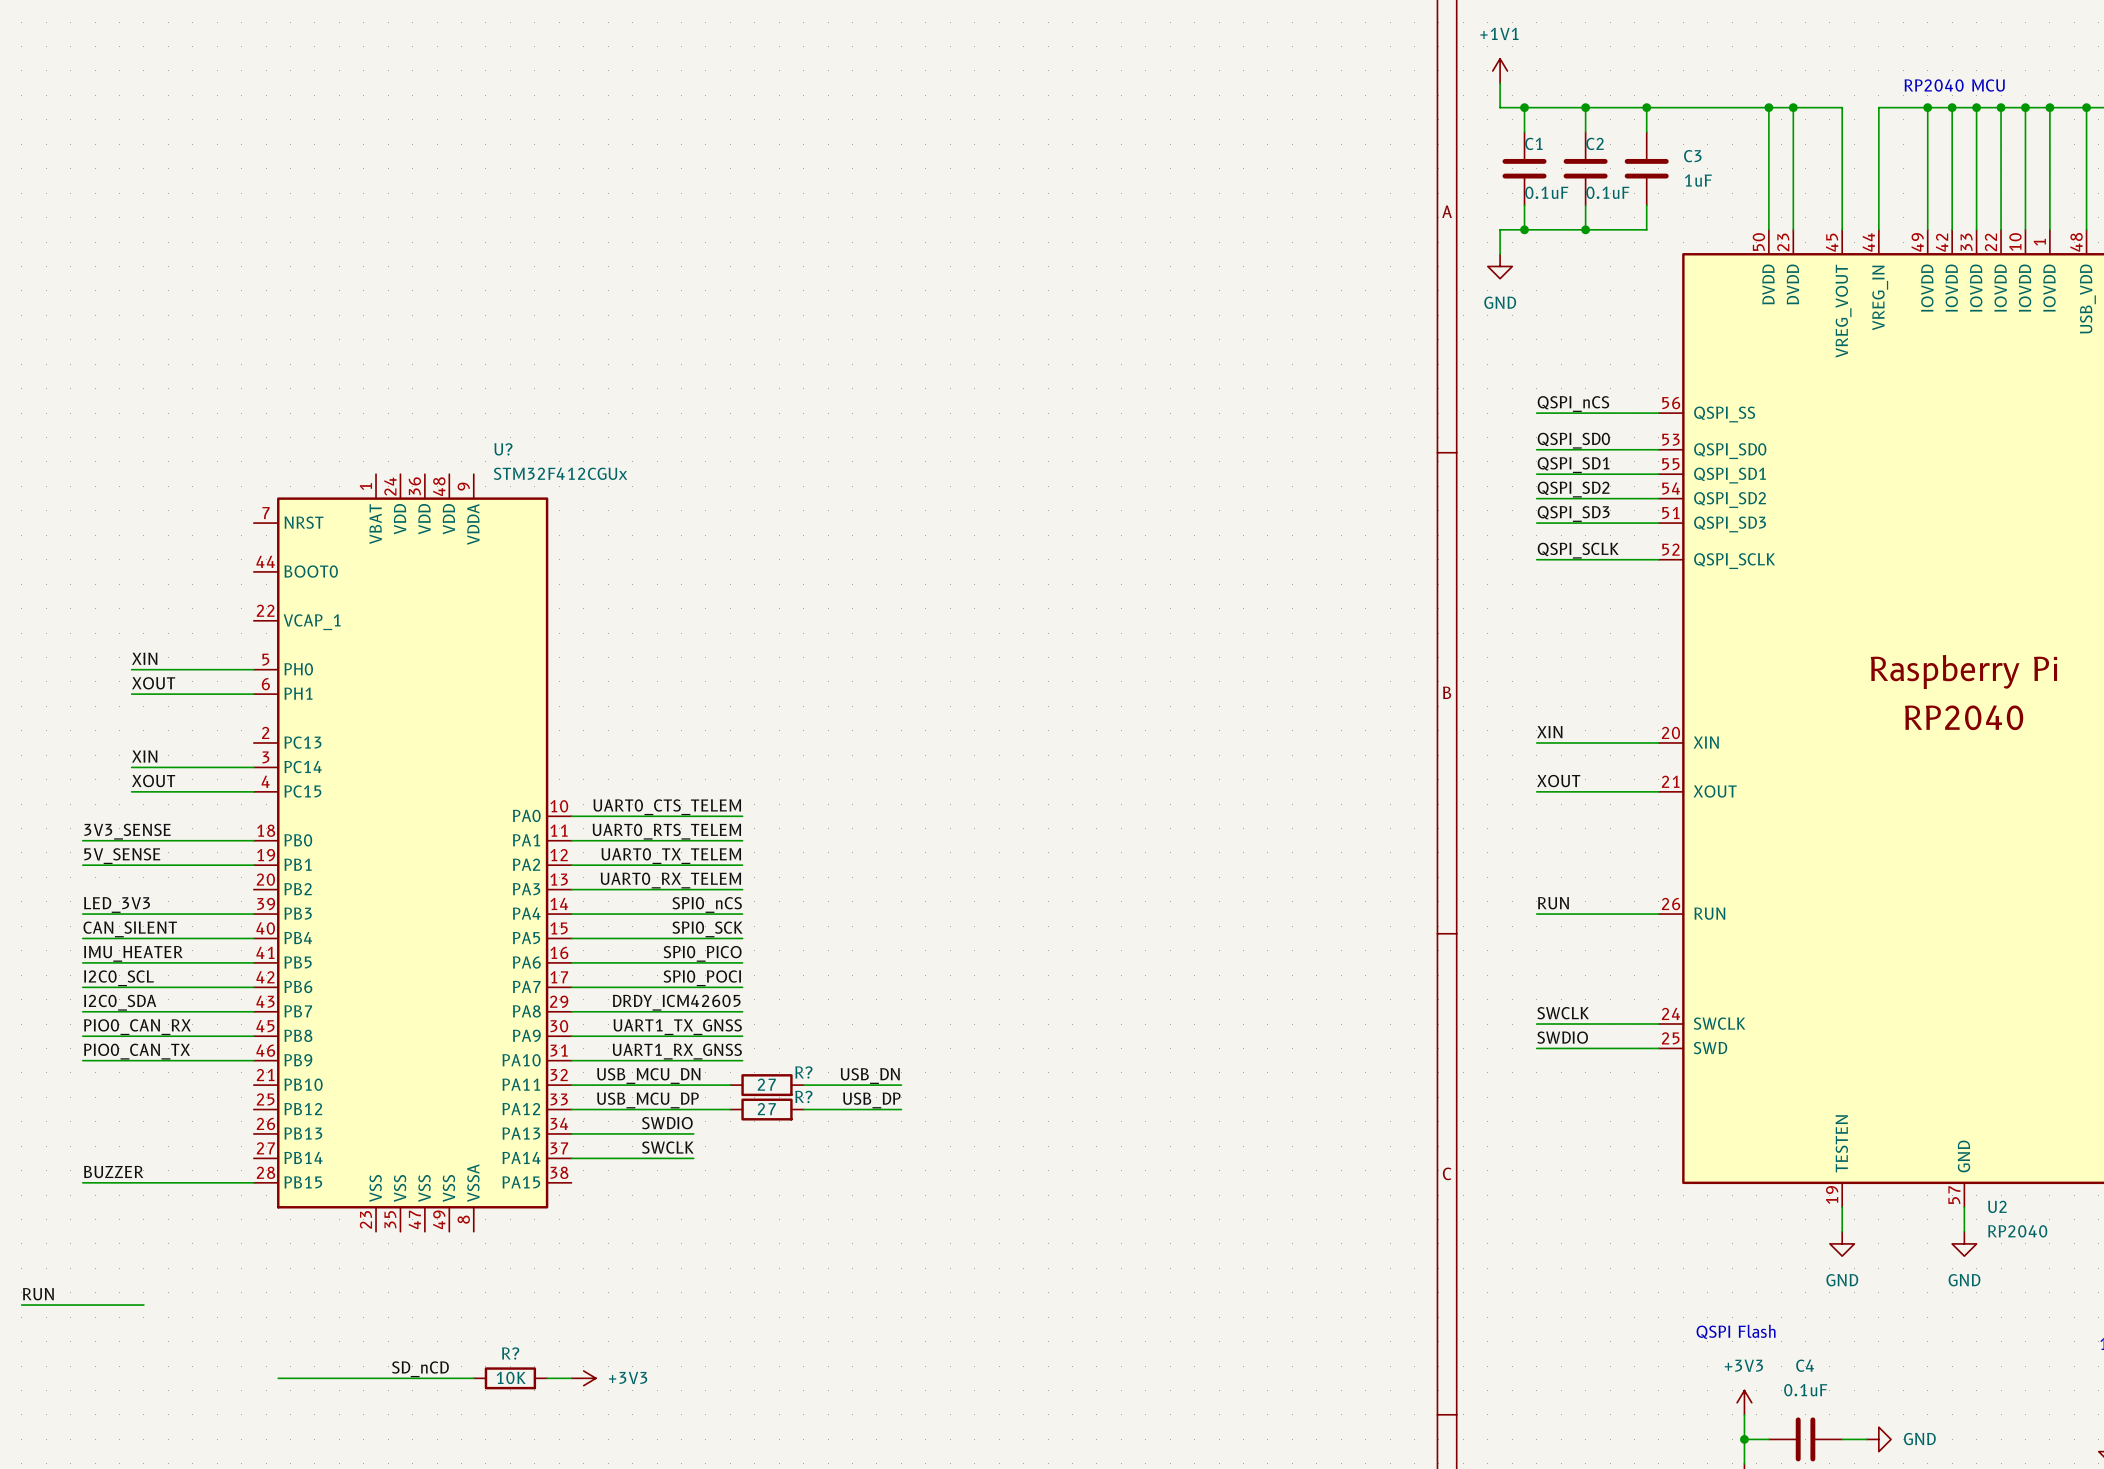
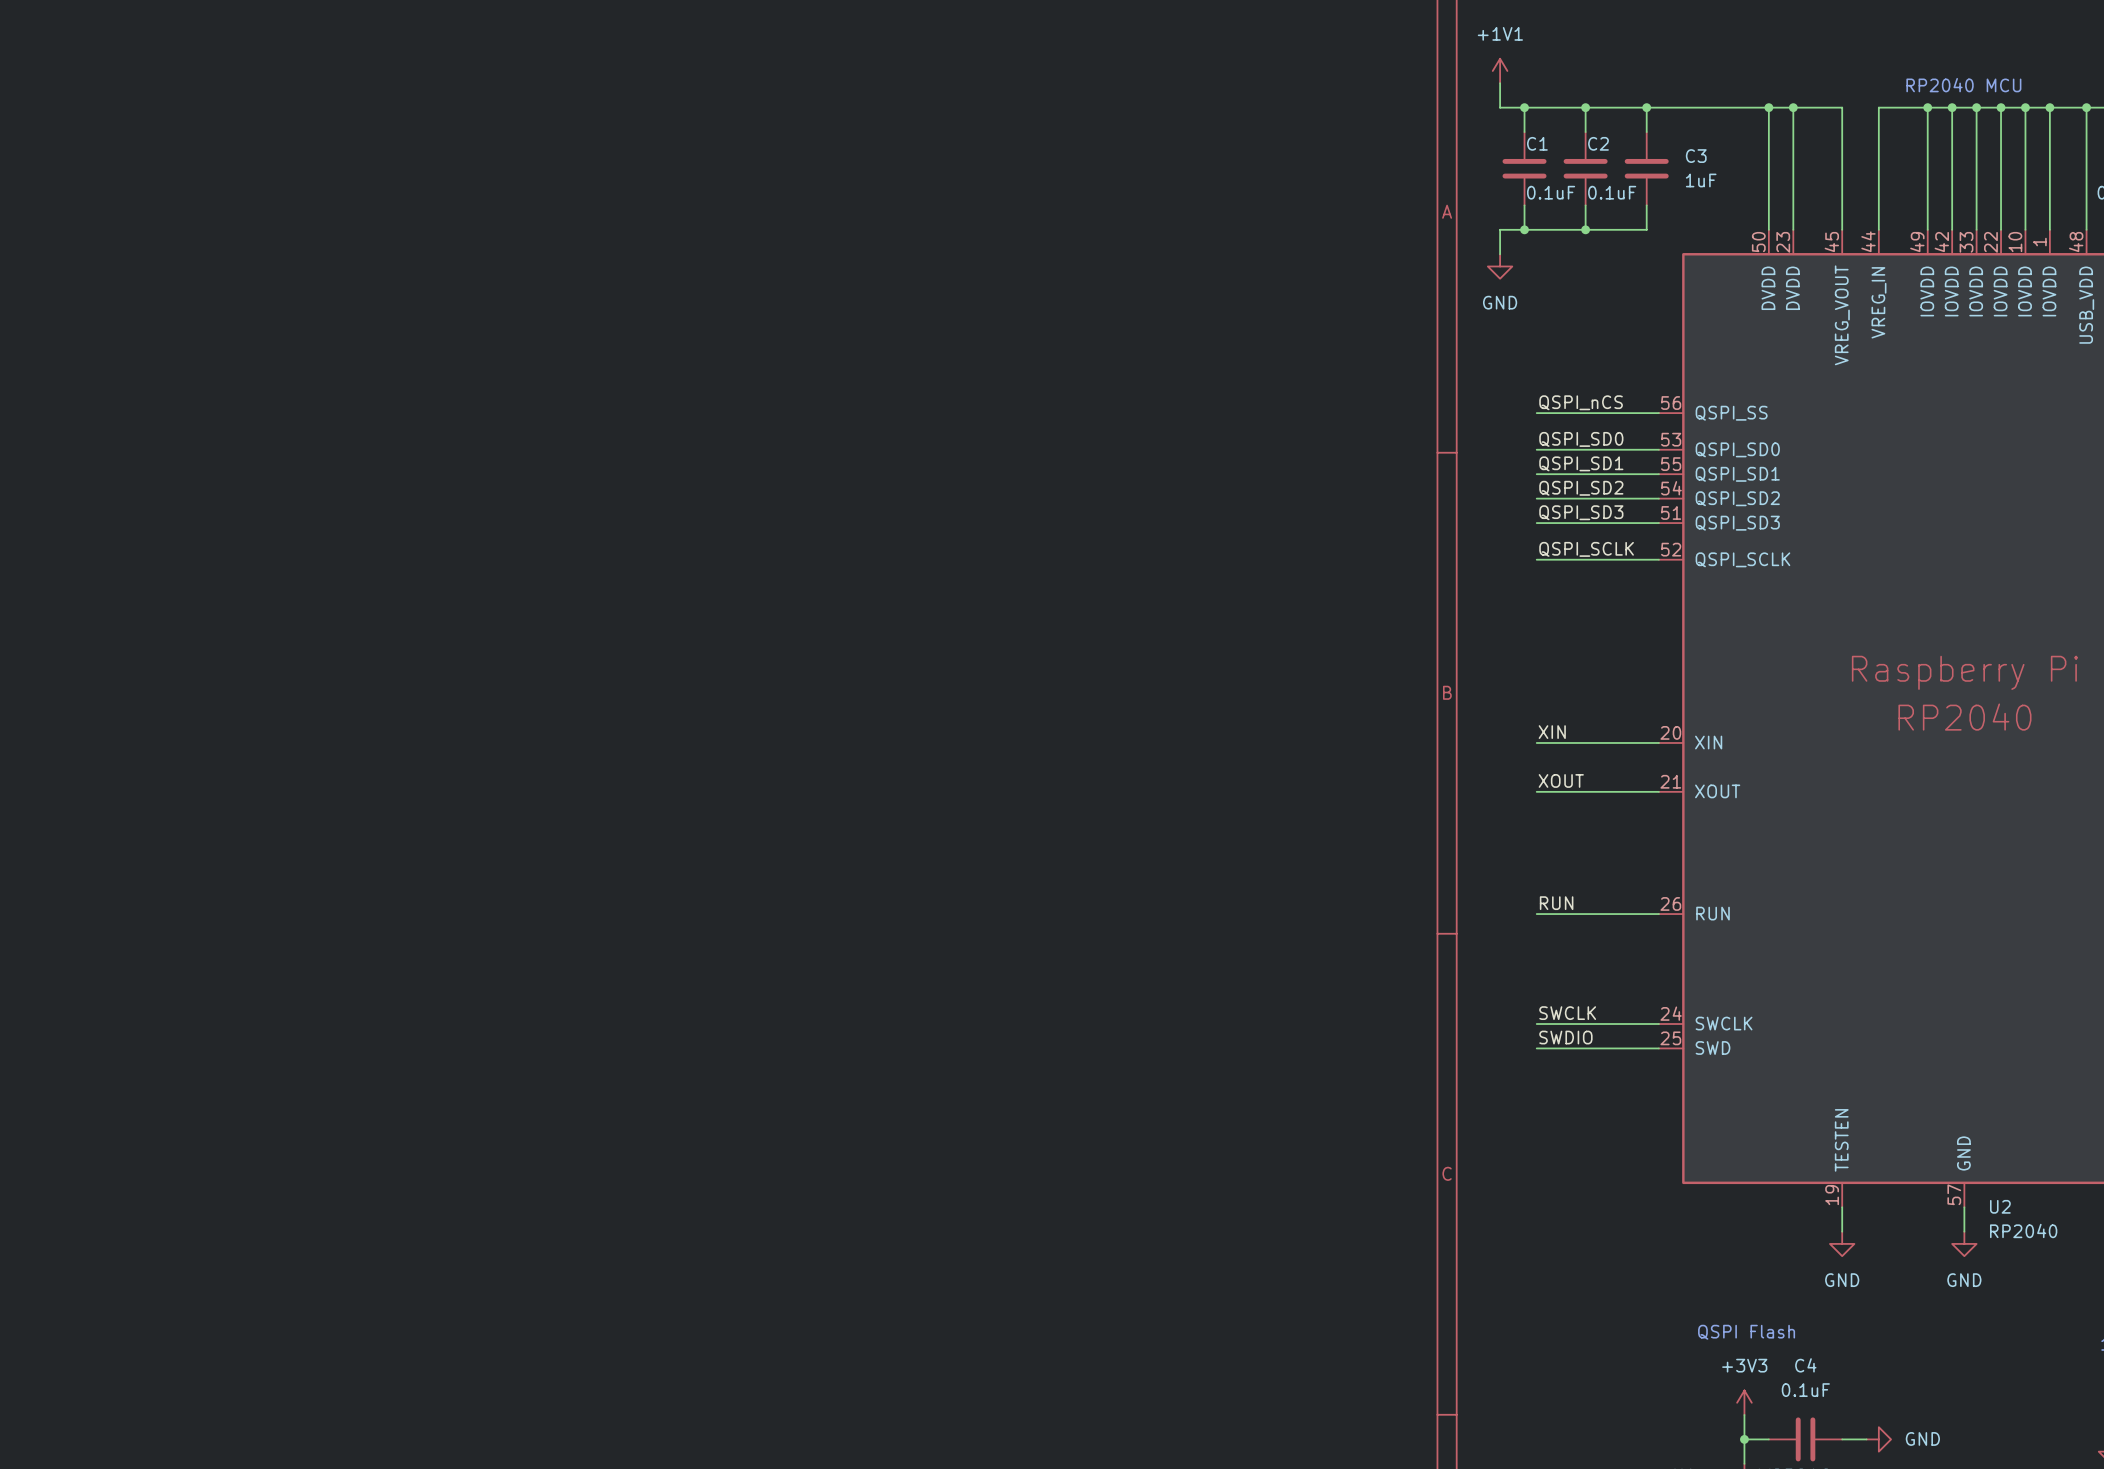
label: XIN (144, 658) -> none
wire: (131, 669) (253, 669) -> none
label: XOUT (153, 683) -> none
wire: (131, 694) (253, 694) -> none
label: XIN (144, 756) -> none
wire: (131, 767) (253, 767) -> none
label: XOUT (153, 781) -> none
wire: (131, 791) (253, 791) -> none
label: UART0_CTS_TELEM (667, 807) -> none
wire: (571, 816) (742, 816) -> none
label: 3V3_SENSE (127, 831) -> none
label: UART0_RTS_TELEM (666, 831) -> none
wire: (82, 840) (253, 840) -> none
wire: (571, 840) (742, 840) -> none
U?: STM32F412CGUx (412, 852) -> none
label: 5V_SENSE (122, 856) -> none
label: UART0_TX_TELEM (671, 856) -> none
wire: (82, 865) (253, 865) -> none
wire: (571, 865) (742, 865) -> none
label: UART0_RX_TELEM (670, 880) -> none
wire: (571, 889) (742, 889) -> none
label: LED_3V3 (117, 904) -> none
label: SPI0_nCS (707, 904) -> none
wire: (82, 914) (253, 914) -> none
wire: (571, 914) (742, 914) -> none
label: CAN_SILENT (130, 929) -> none
label: SPI0_SCK (707, 929) -> none
wire: (82, 938) (253, 938) -> none
wire: (571, 938) (742, 938) -> none
label: IMU_HEATER (133, 953) -> none
label: SPI0_PICO (702, 953) -> none
wire: (82, 962) (253, 962) -> none
wire: (571, 962) (742, 962) -> none
label: I2C0_SCL (118, 978) -> none
label: SPI0_POCI (702, 978) -> none
wire: (82, 987) (253, 987) -> none
wire: (571, 987) (742, 987) -> none
label: I2C0_SDA (120, 1002) -> none
label: DRDY_ICM42605 (676, 1002) -> none
wire: (82, 1011) (253, 1011) -> none
wire: (571, 1011) (742, 1011) -> none
label: PIO0_CAN_RX (137, 1027) -> none
label: UART1_TX_GNSS (677, 1027) -> none
wire: (82, 1036) (253, 1036) -> none
wire: (571, 1036) (742, 1036) -> none
label: PIO0_CAN_TX (136, 1051) -> none
label: UART1_RX_GNSS (677, 1051) -> none
wire: (82, 1060) (253, 1060) -> none
wire: (571, 1060) (742, 1060) -> none
label: USB_MCU_DN (648, 1076) -> none
label: USB_DN (870, 1076) -> none
wire: (571, 1085) (730, 1085) -> none
R?: 27 (766, 1085) -> none
wire: (803, 1085) (901, 1085) -> none
label: USB_MCU_DP (647, 1100) -> none
label: USB_DP (871, 1100) -> none
wire: (571, 1109) (730, 1109) -> none
R?: 27 (766, 1109) -> none
wire: (803, 1109) (901, 1109) -> none
label: SWDIO (667, 1123) -> none
wire: (571, 1133) (693, 1133) -> none
label: SWCLK (667, 1147) -> none
wire: (571, 1158) (693, 1158) -> none
label: BUZZER (113, 1172) -> none
wire: (82, 1182) (253, 1182) -> none
label: RUN (38, 1294) -> none
wire: (21, 1305) (143, 1305) -> none
label: SD_nCD (420, 1369) -> none
wire: (278, 1378) (473, 1378) -> none
R?: 10K (510, 1378) -> none
wire: (547, 1378) (571, 1378) -> none
power symbol: +3V3 (583, 1378) -> none

